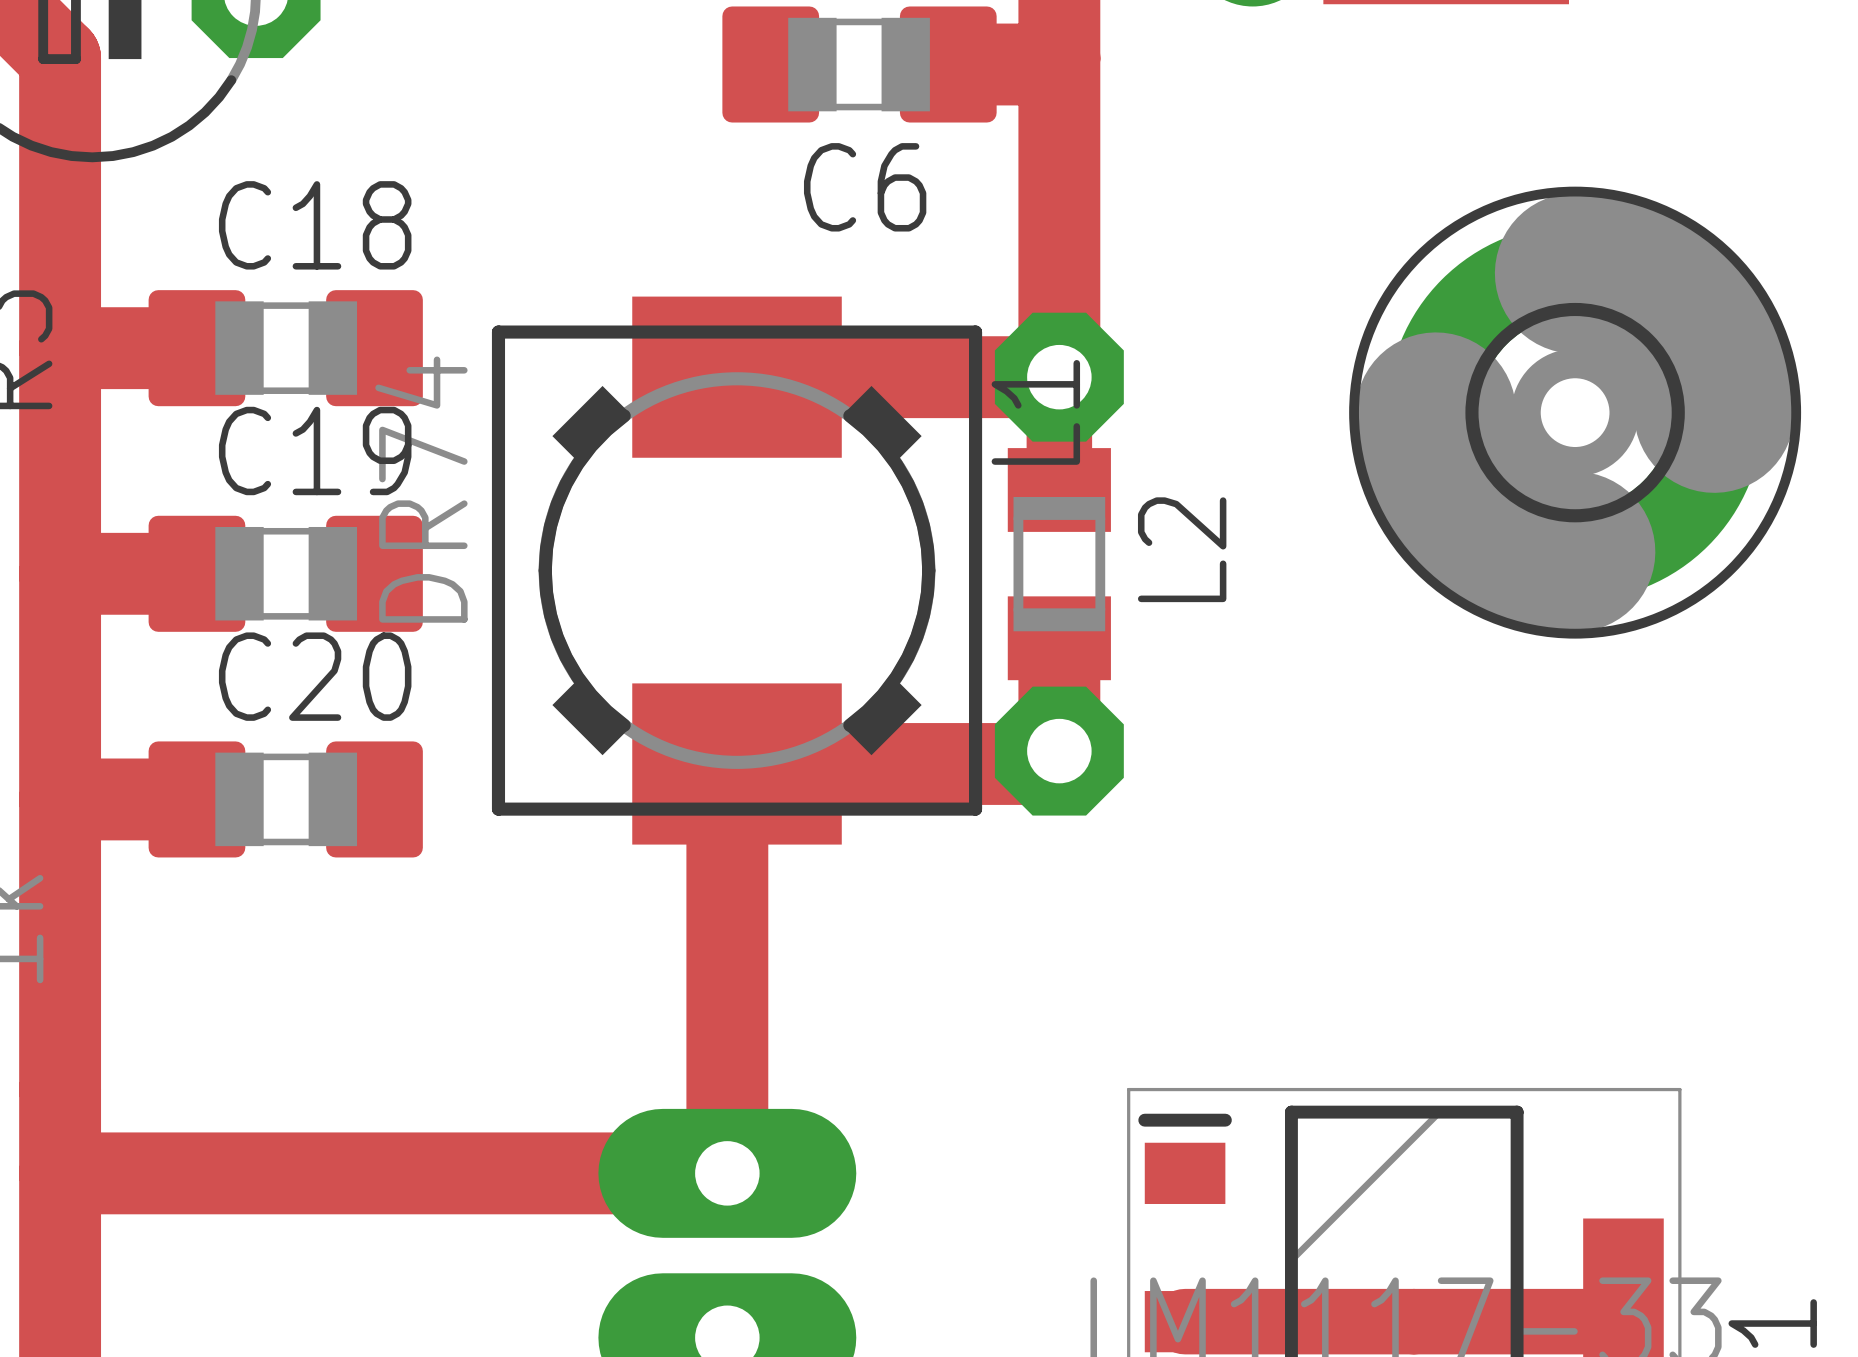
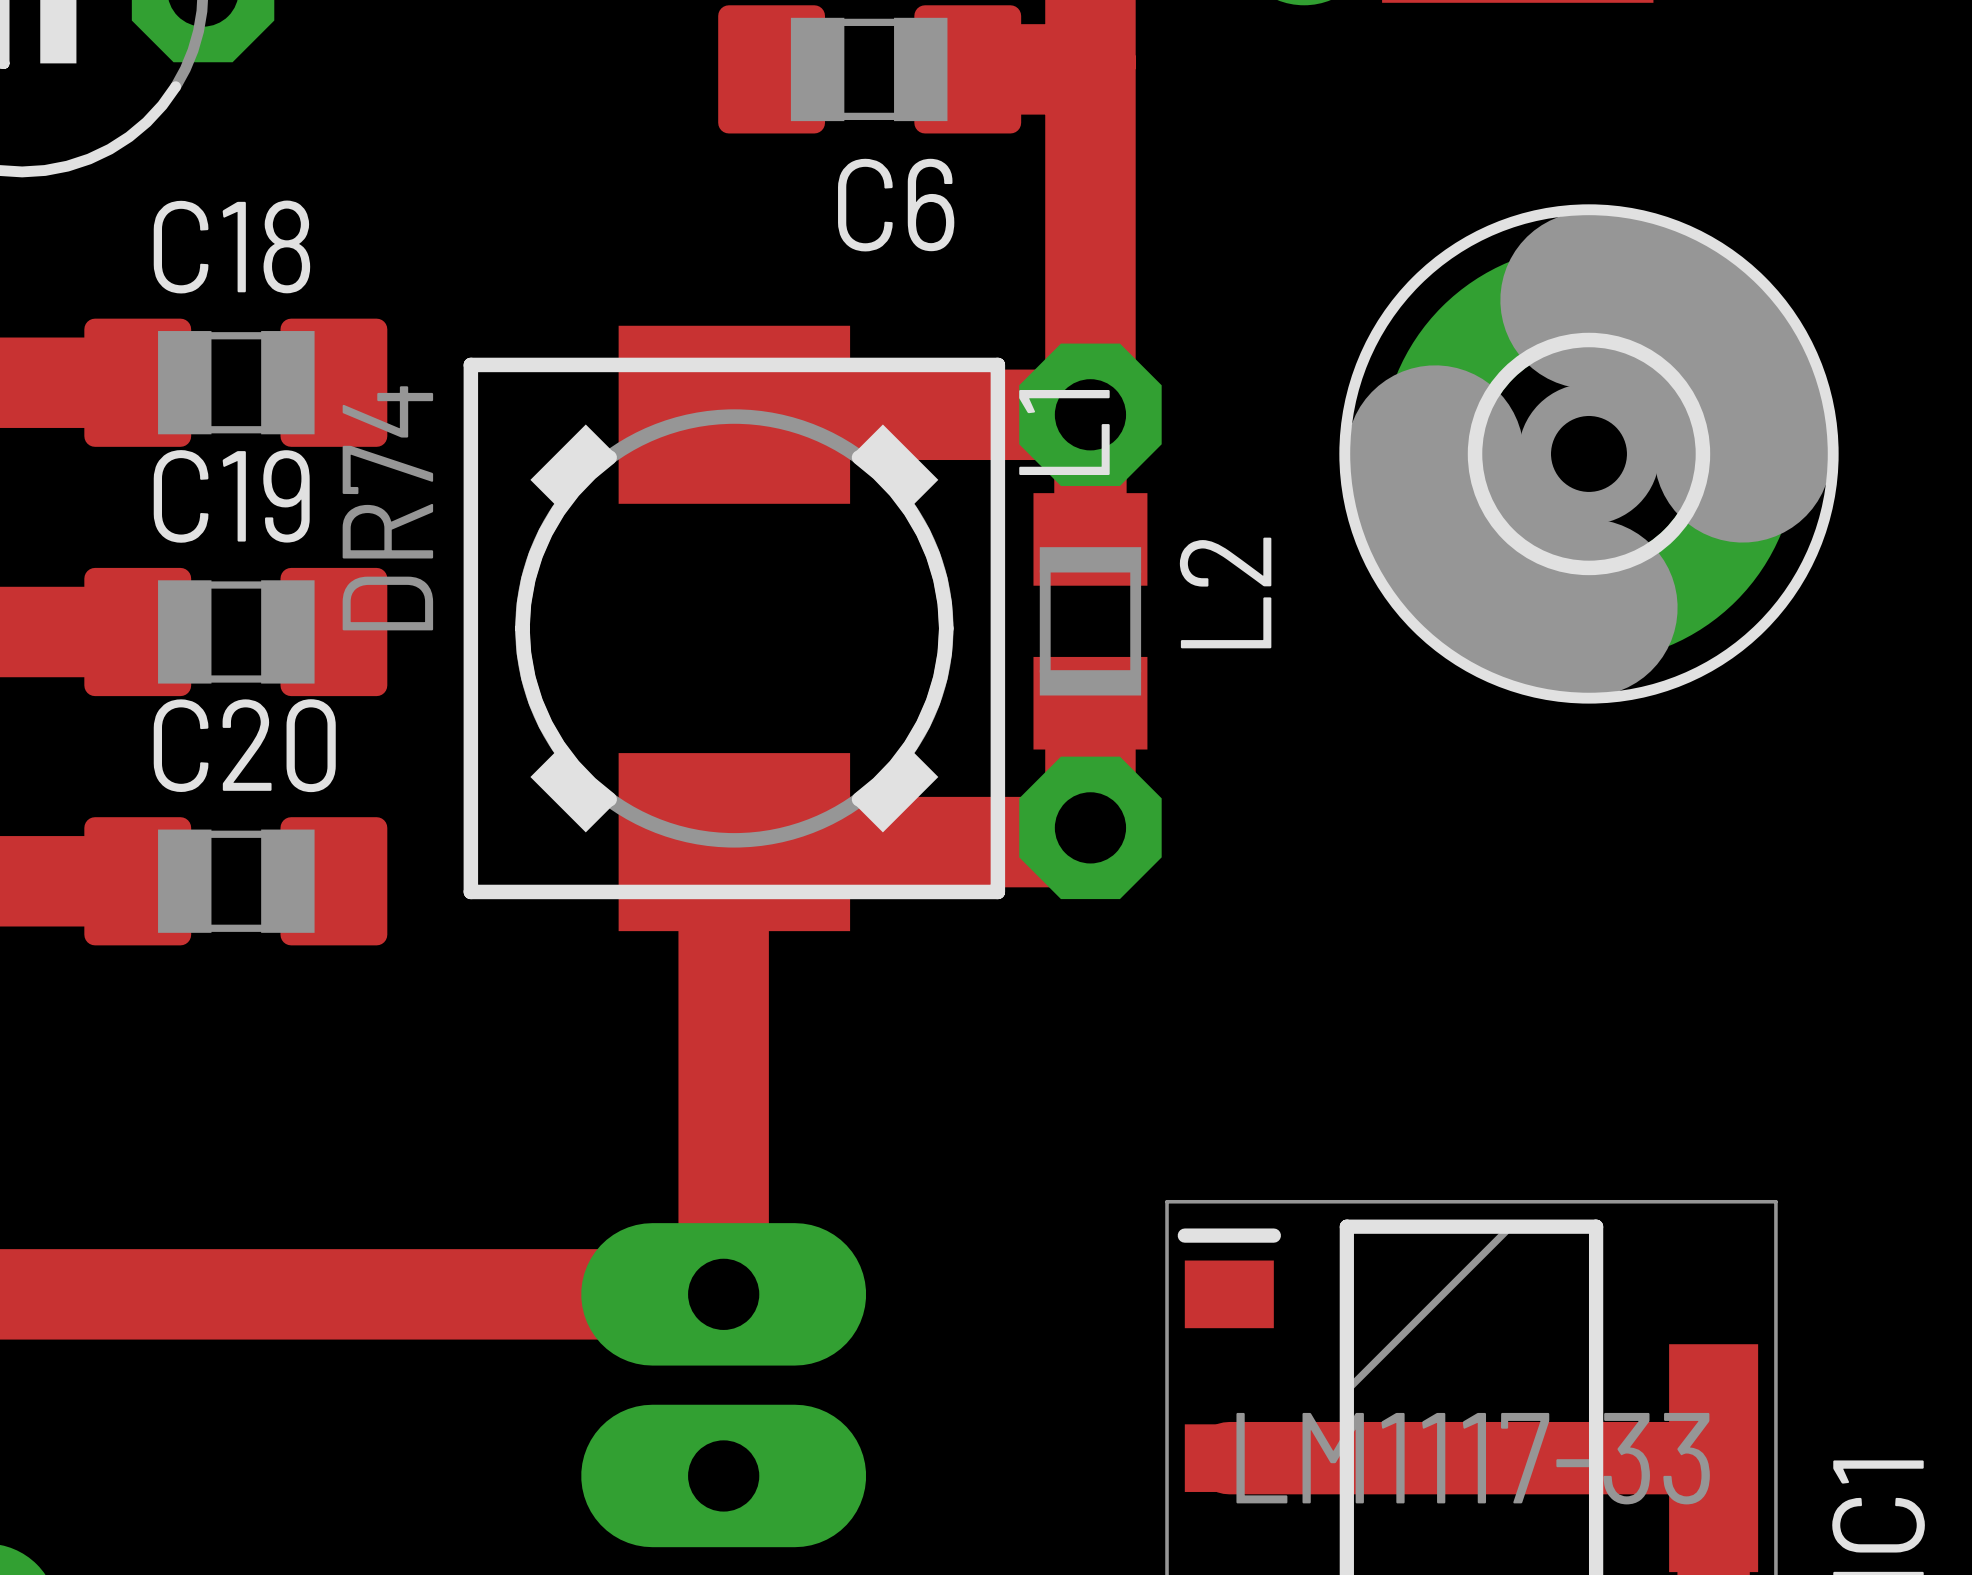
part position: (1575, 412) -> (1588, 453)

